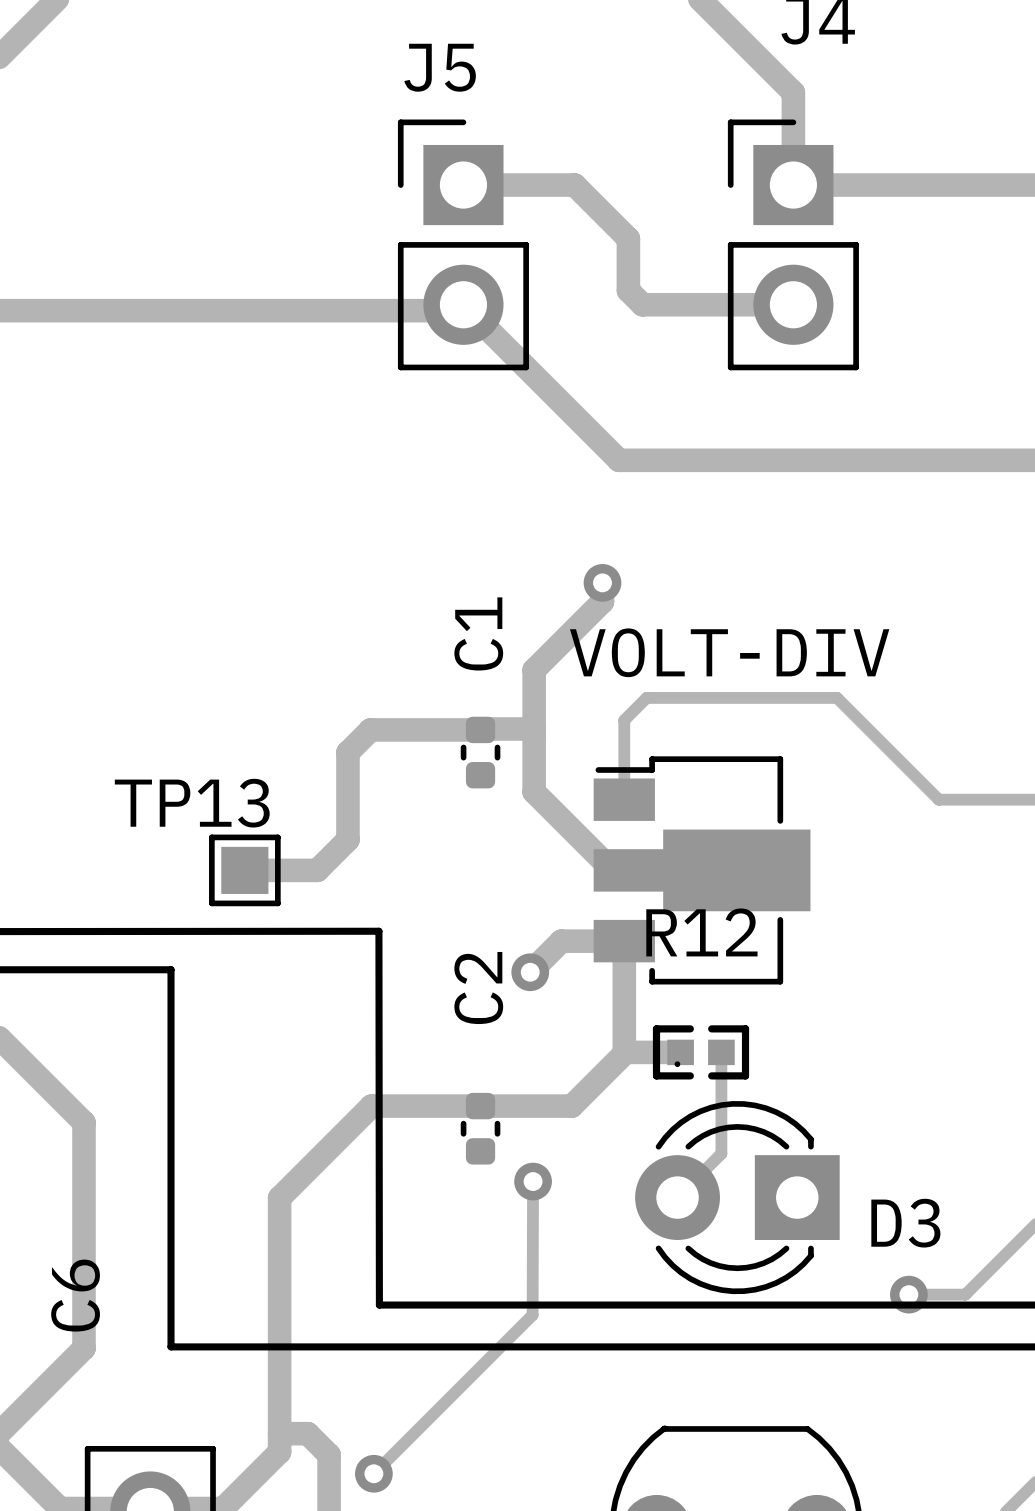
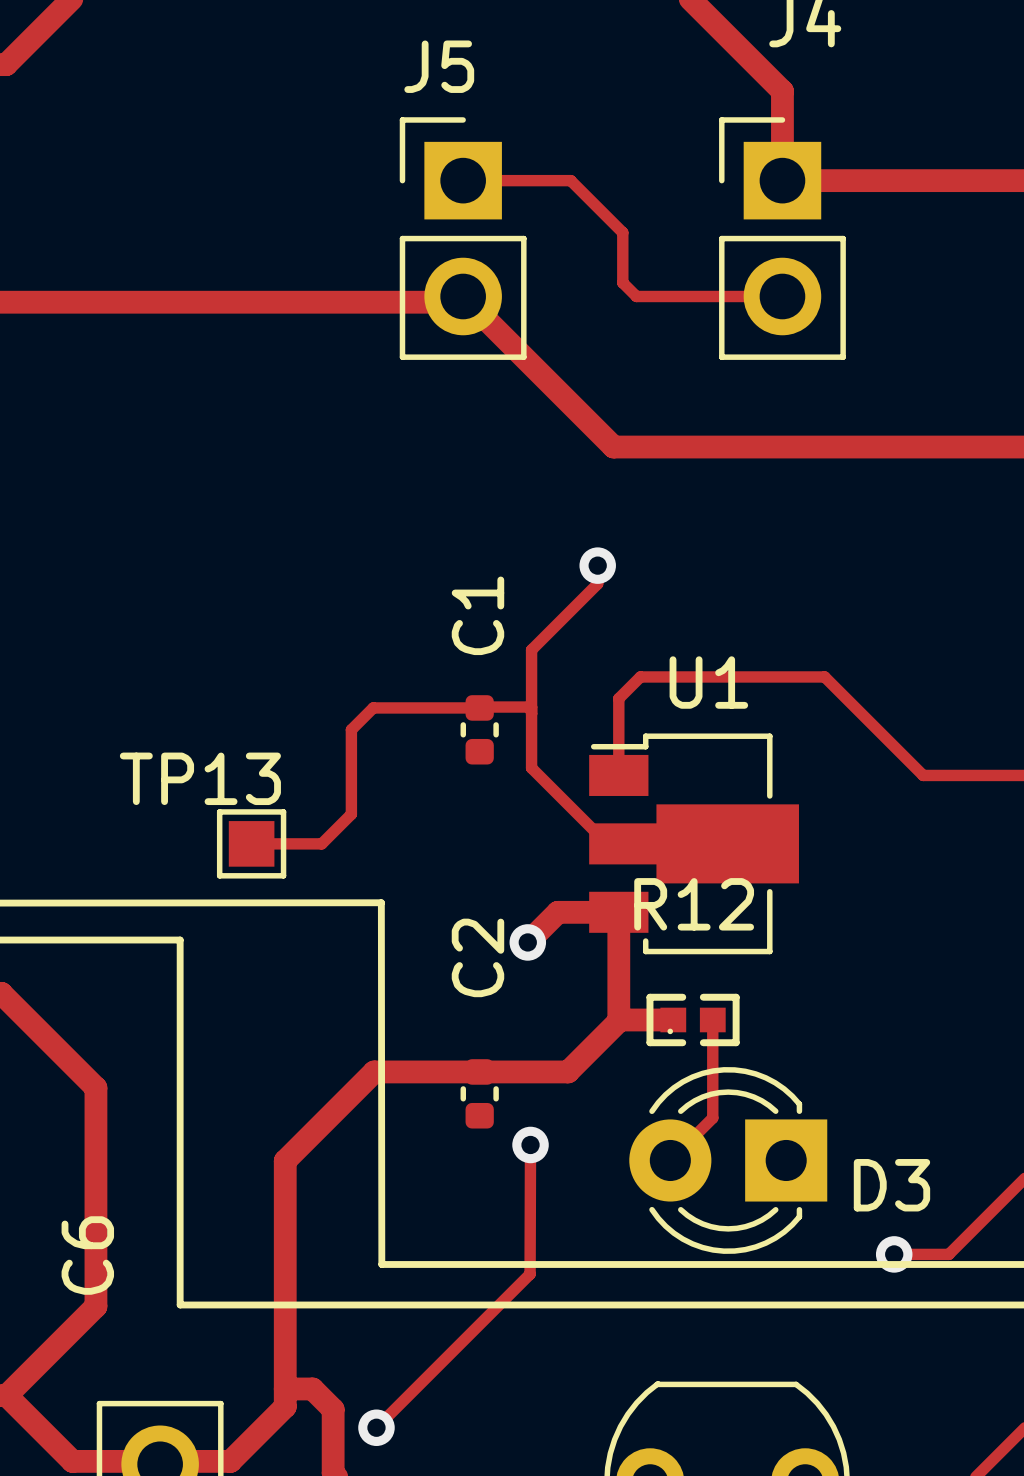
track width: thick (463, 185) (574, 185) (628, 238) (628, 290) (642, 304) (793, 304) -> thin (463, 180) (570, 180) (622, 232) (622, 282) (636, 296) (782, 296)
track width: thick (602, 582) (602, 601) (534, 670) (534, 792) (612, 870) (628, 870) -> thin (597, 565) (597, 583) (531, 650) (531, 768) (607, 843) (622, 843)
VOLT-DIV name: VOLT-DIV (729, 652) -> U1 (708, 682)
track width: thick (534, 728) (370, 729) (347, 752) (347, 839) (317, 870) (244, 870) -> thin (531, 707) (373, 707) (351, 729) (351, 814) (321, 843) (251, 843)

